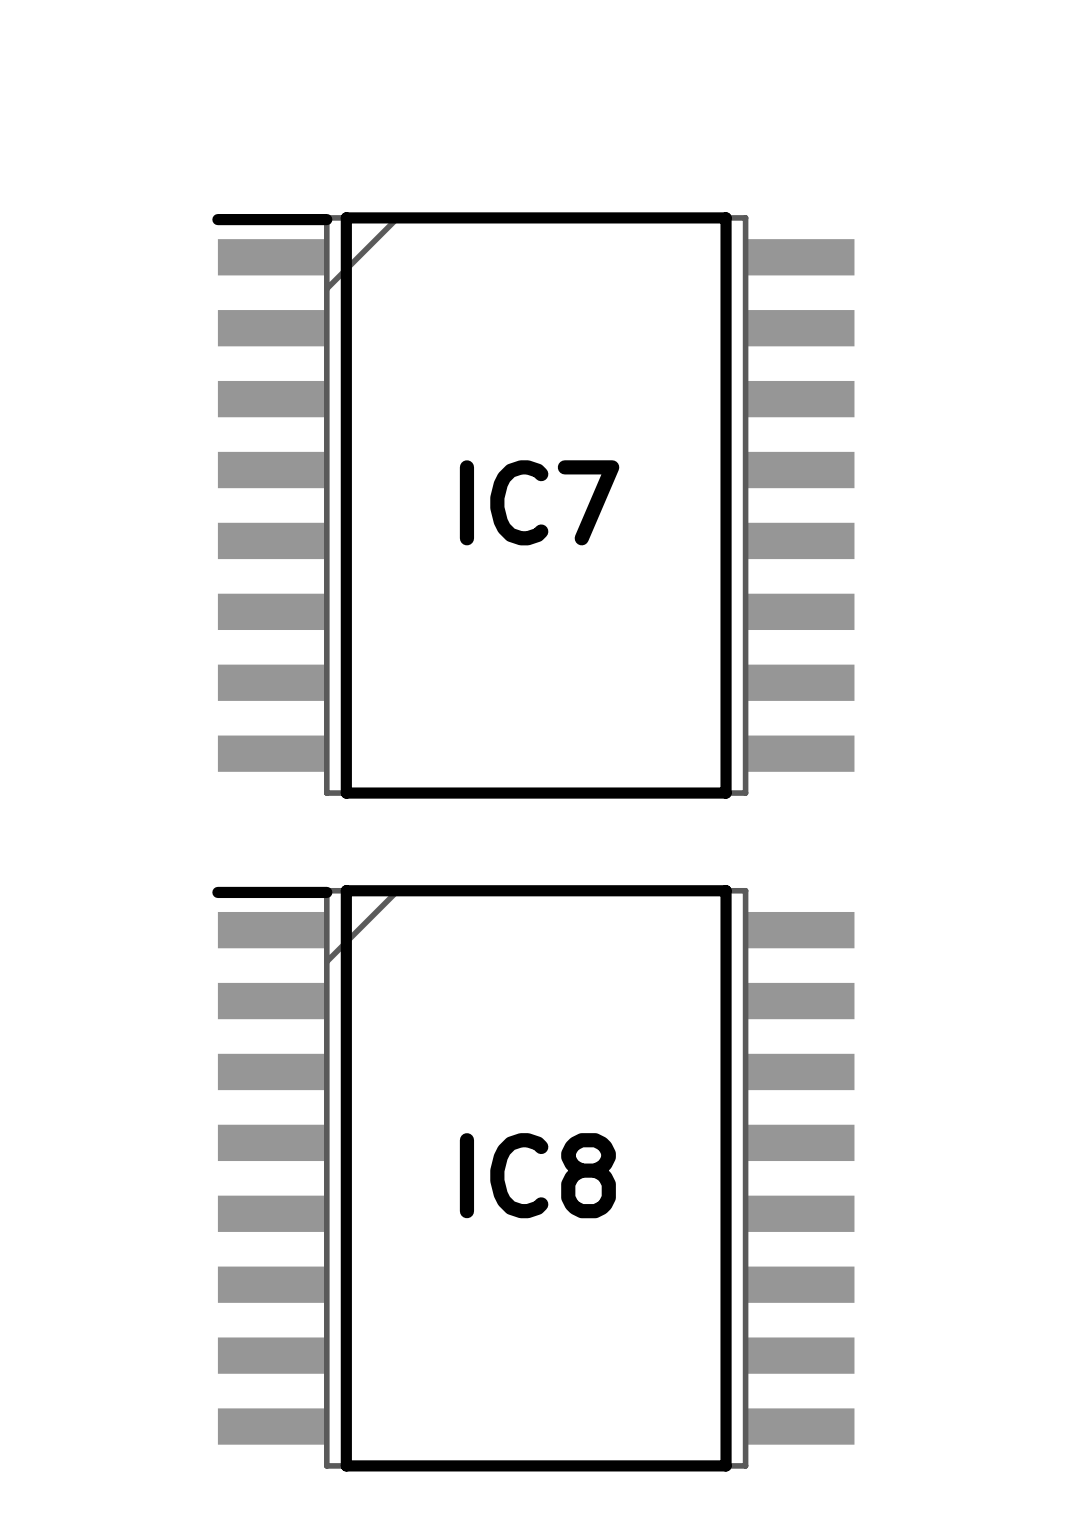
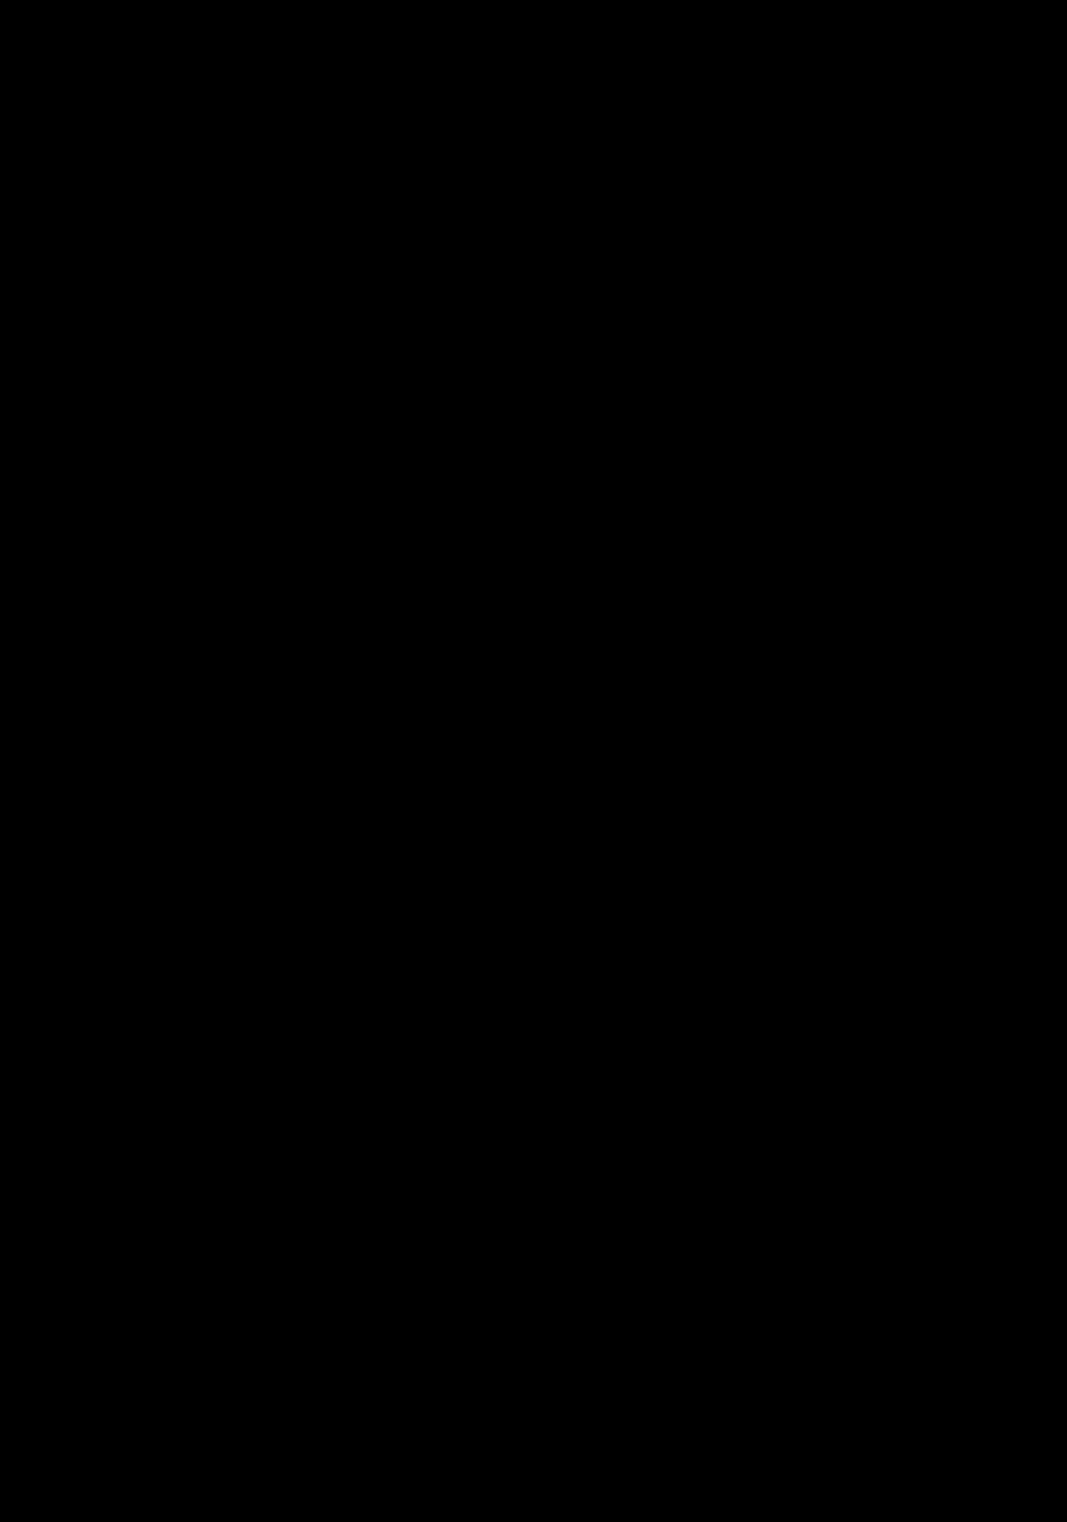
IC7: (533, 505) -> none
IC8: (533, 1178) -> none

